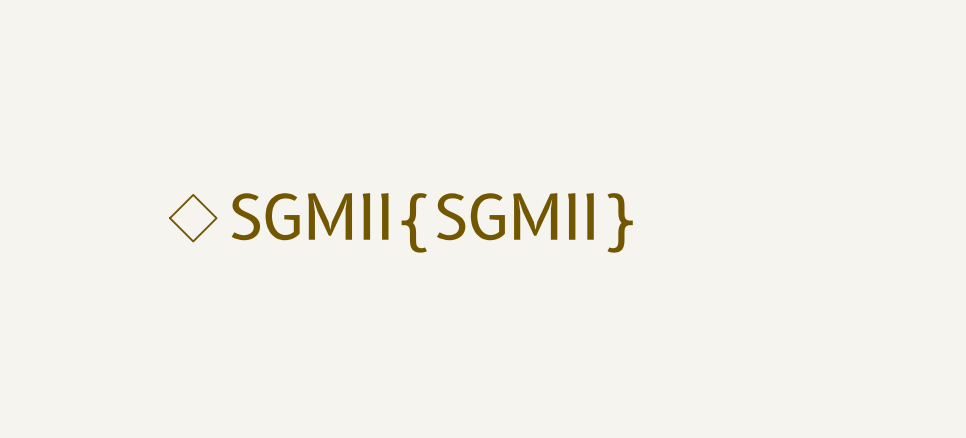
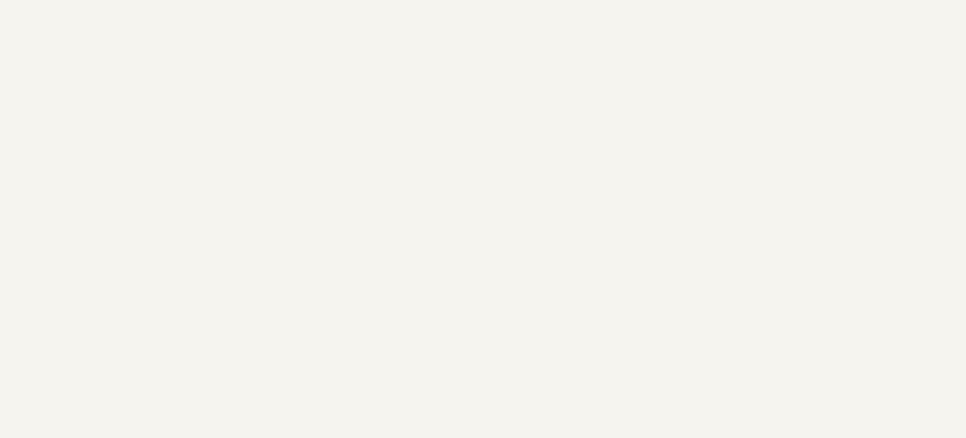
hierarchical label: SGMII{SGMII} (432, 222) -> none

